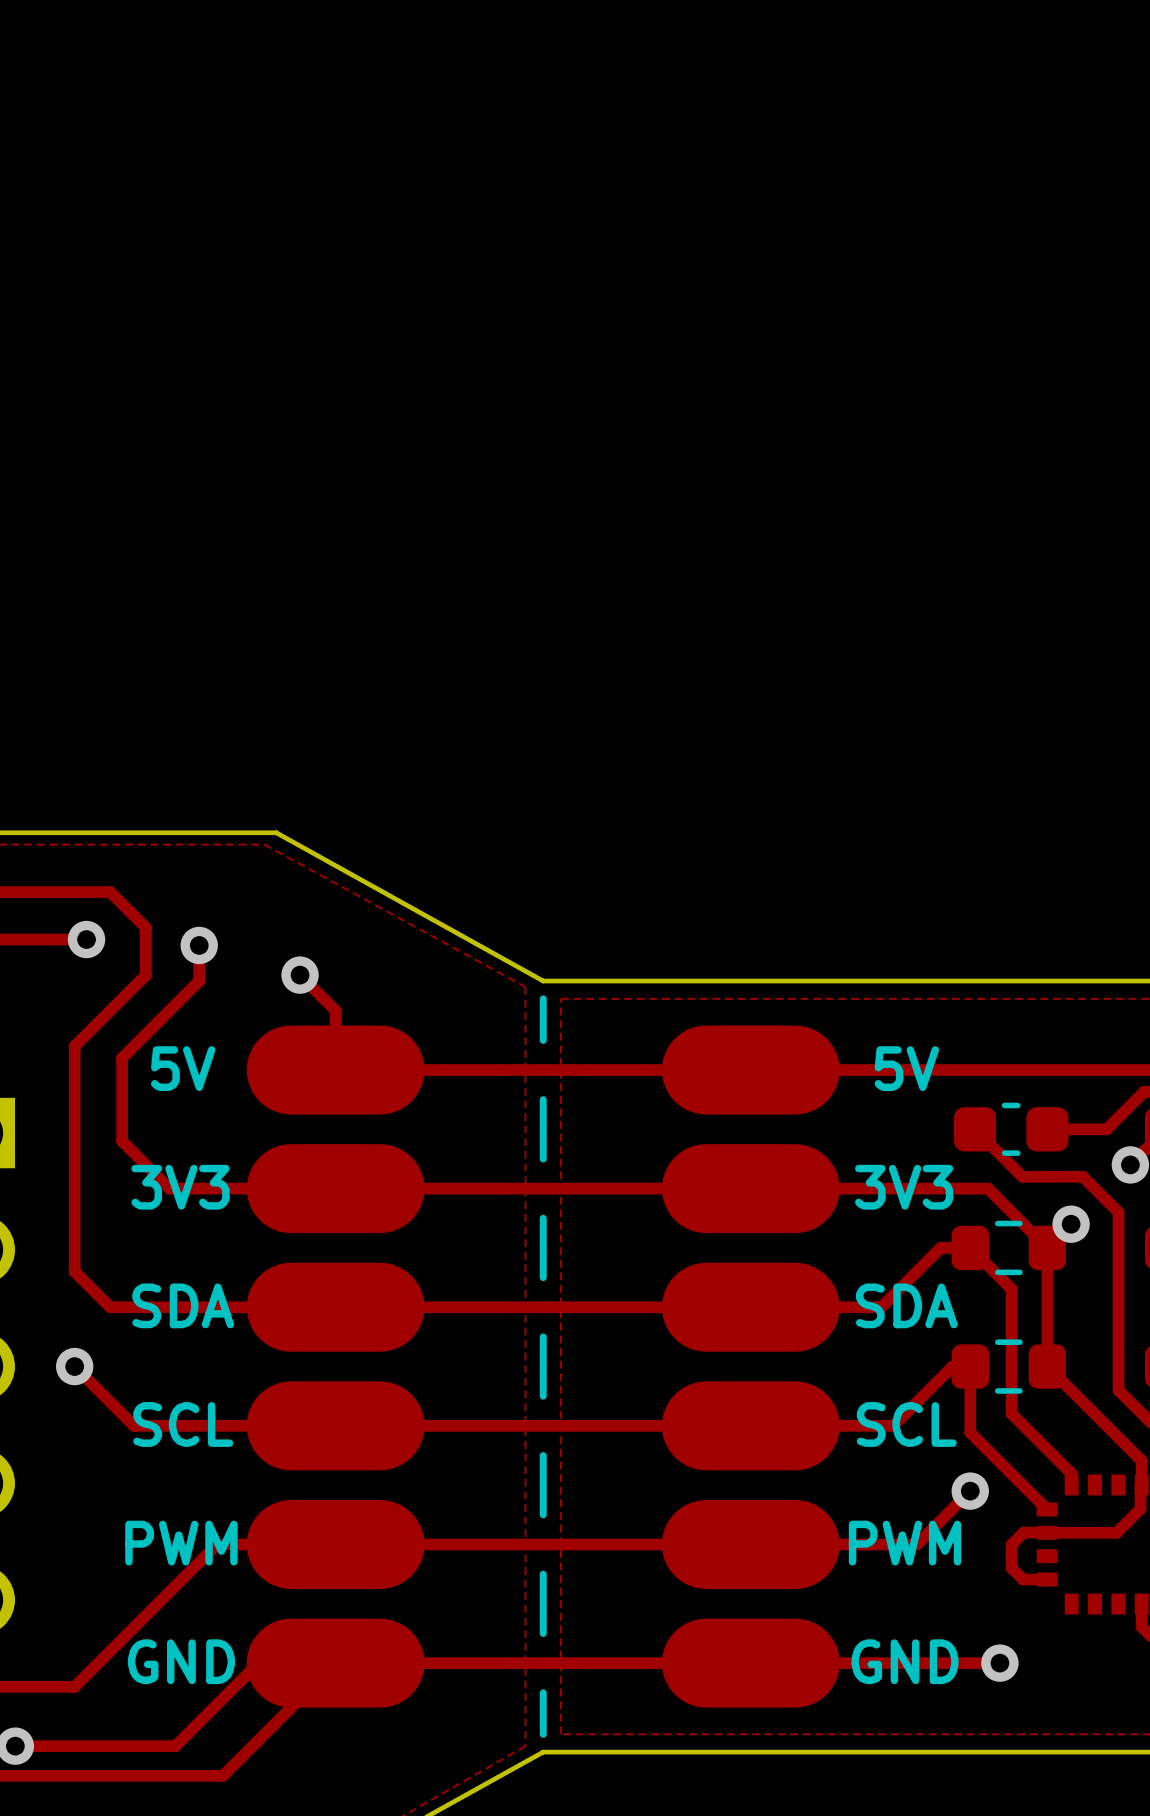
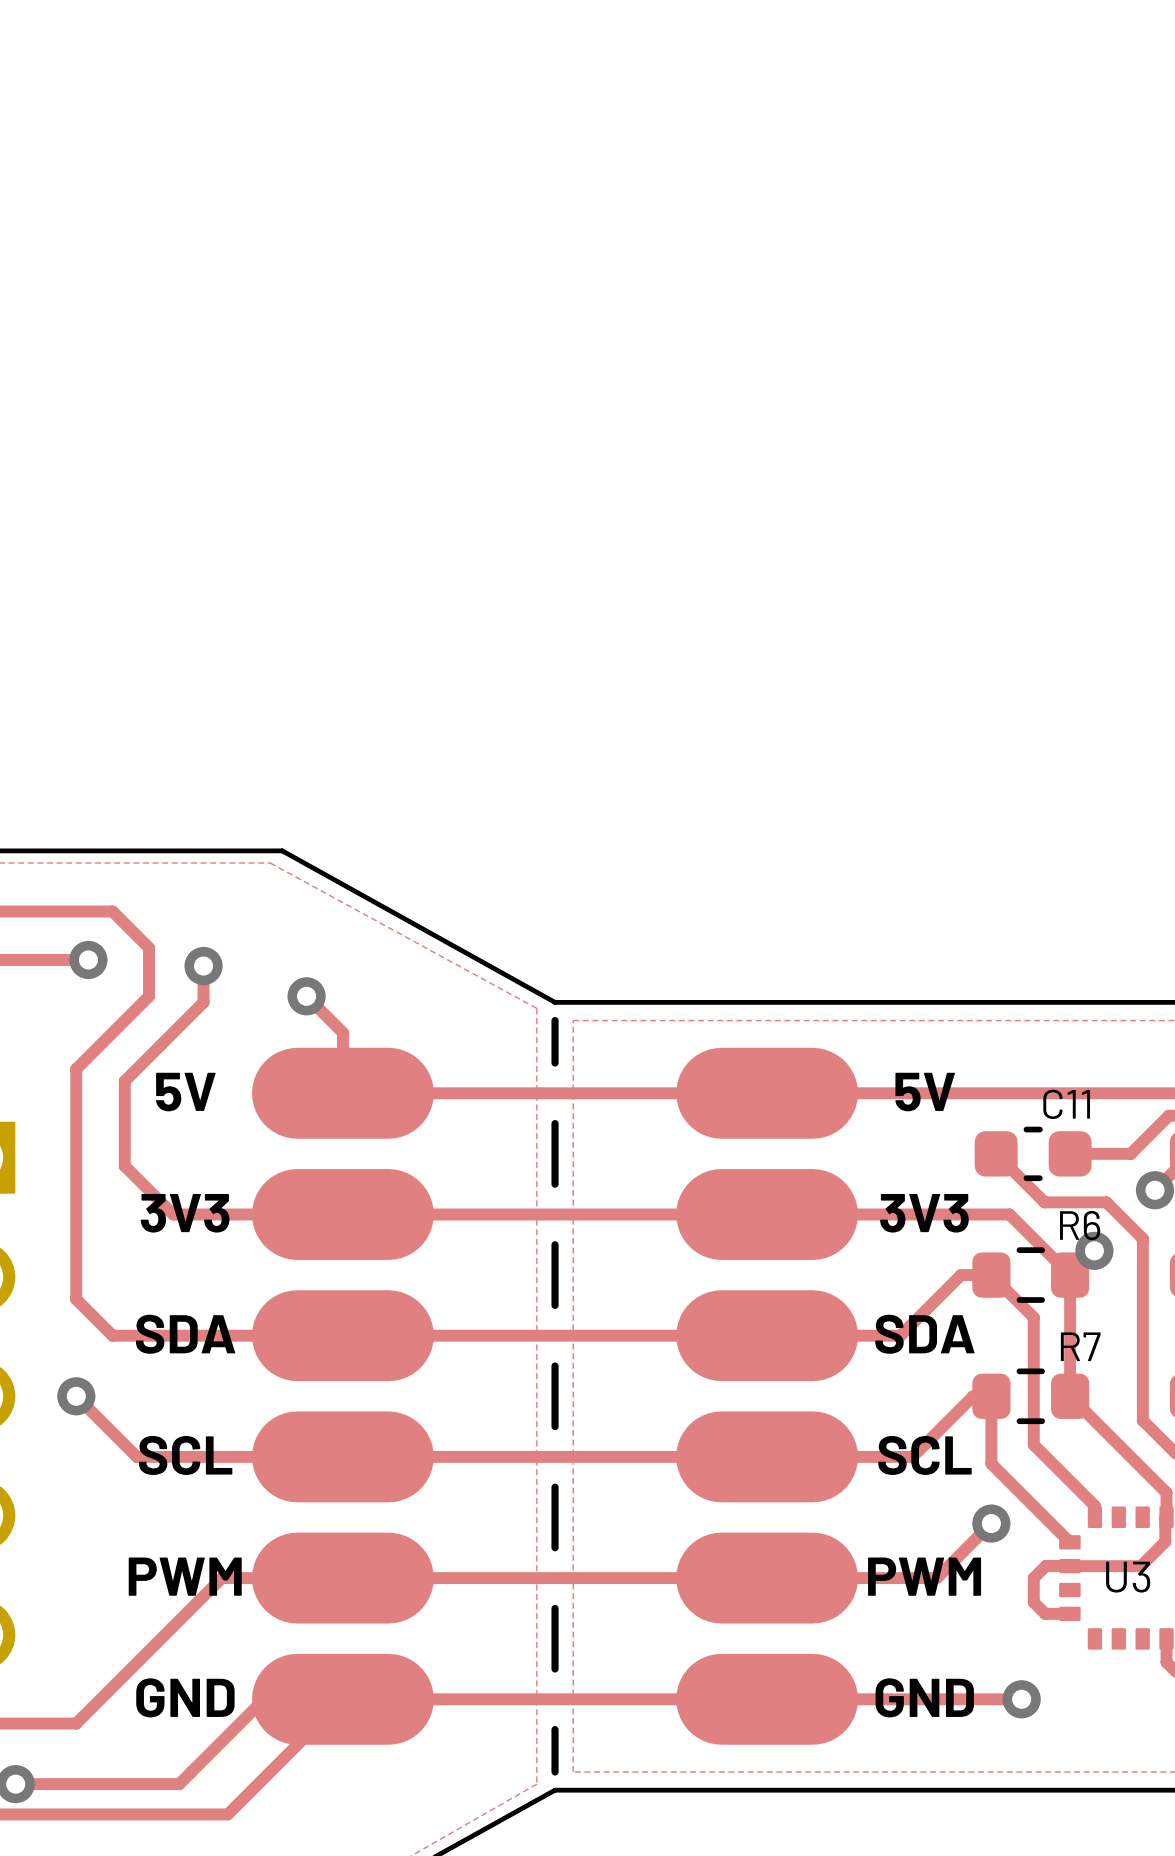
C11 name: none -> C11 (1066, 1104)
R6 name: none -> R6 (1080, 1225)
R7 name: none -> R7 (1080, 1346)
U3 name: none -> U3 (1128, 1577)

